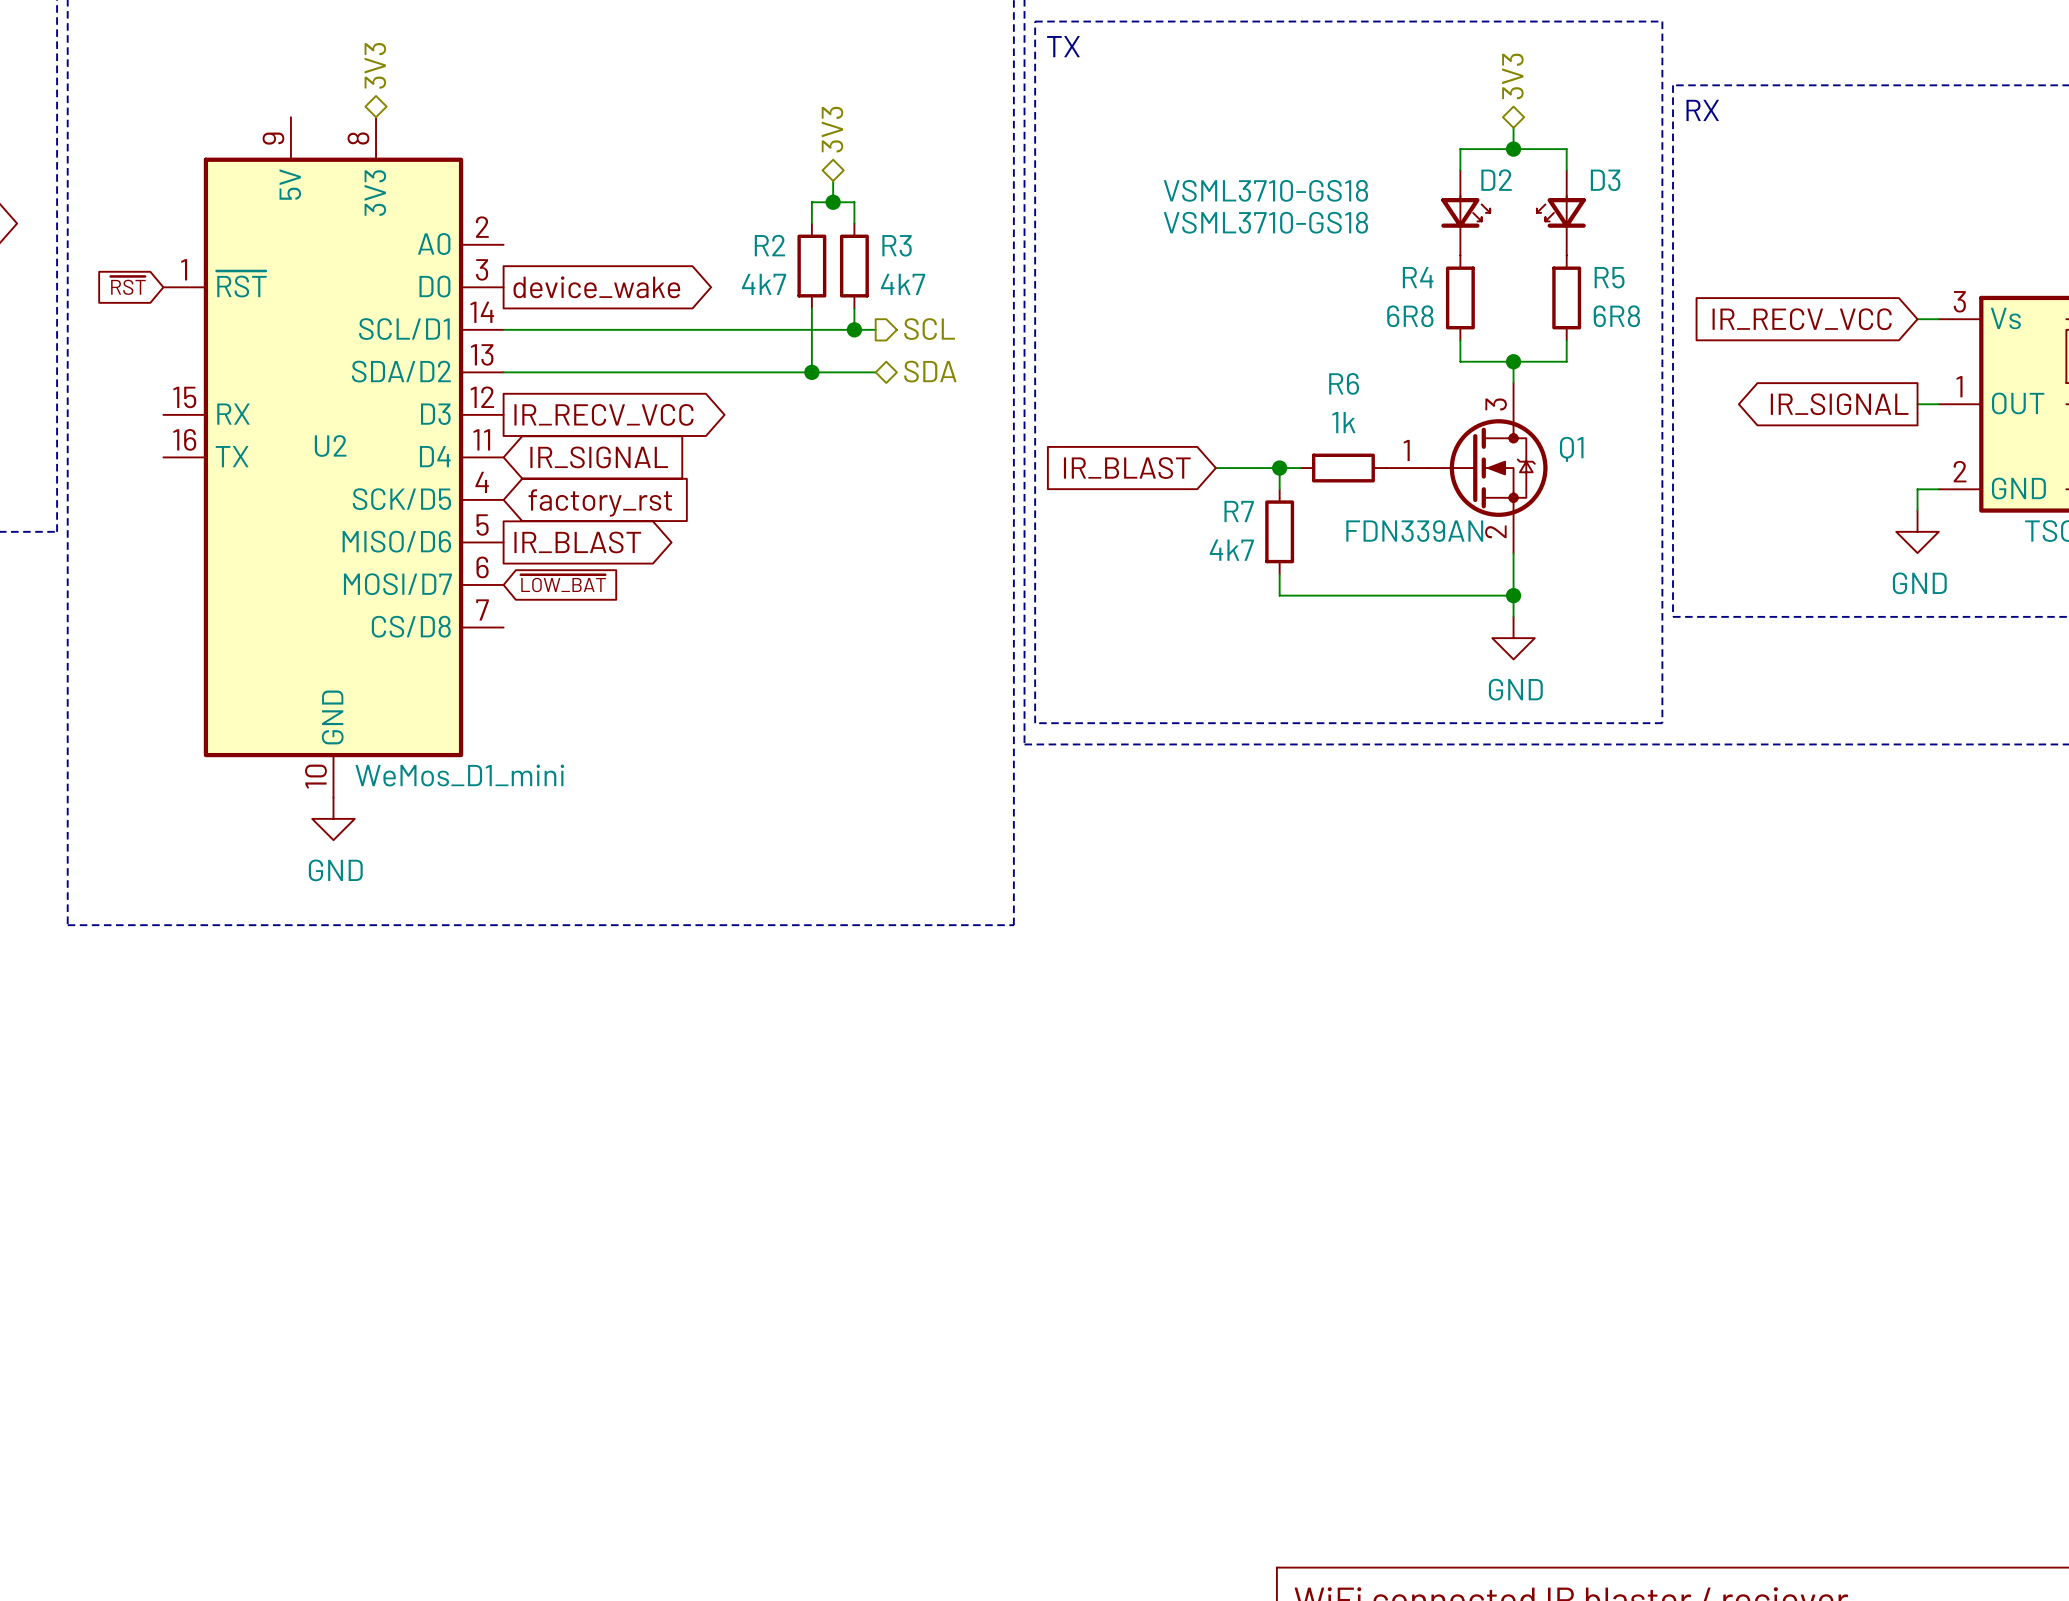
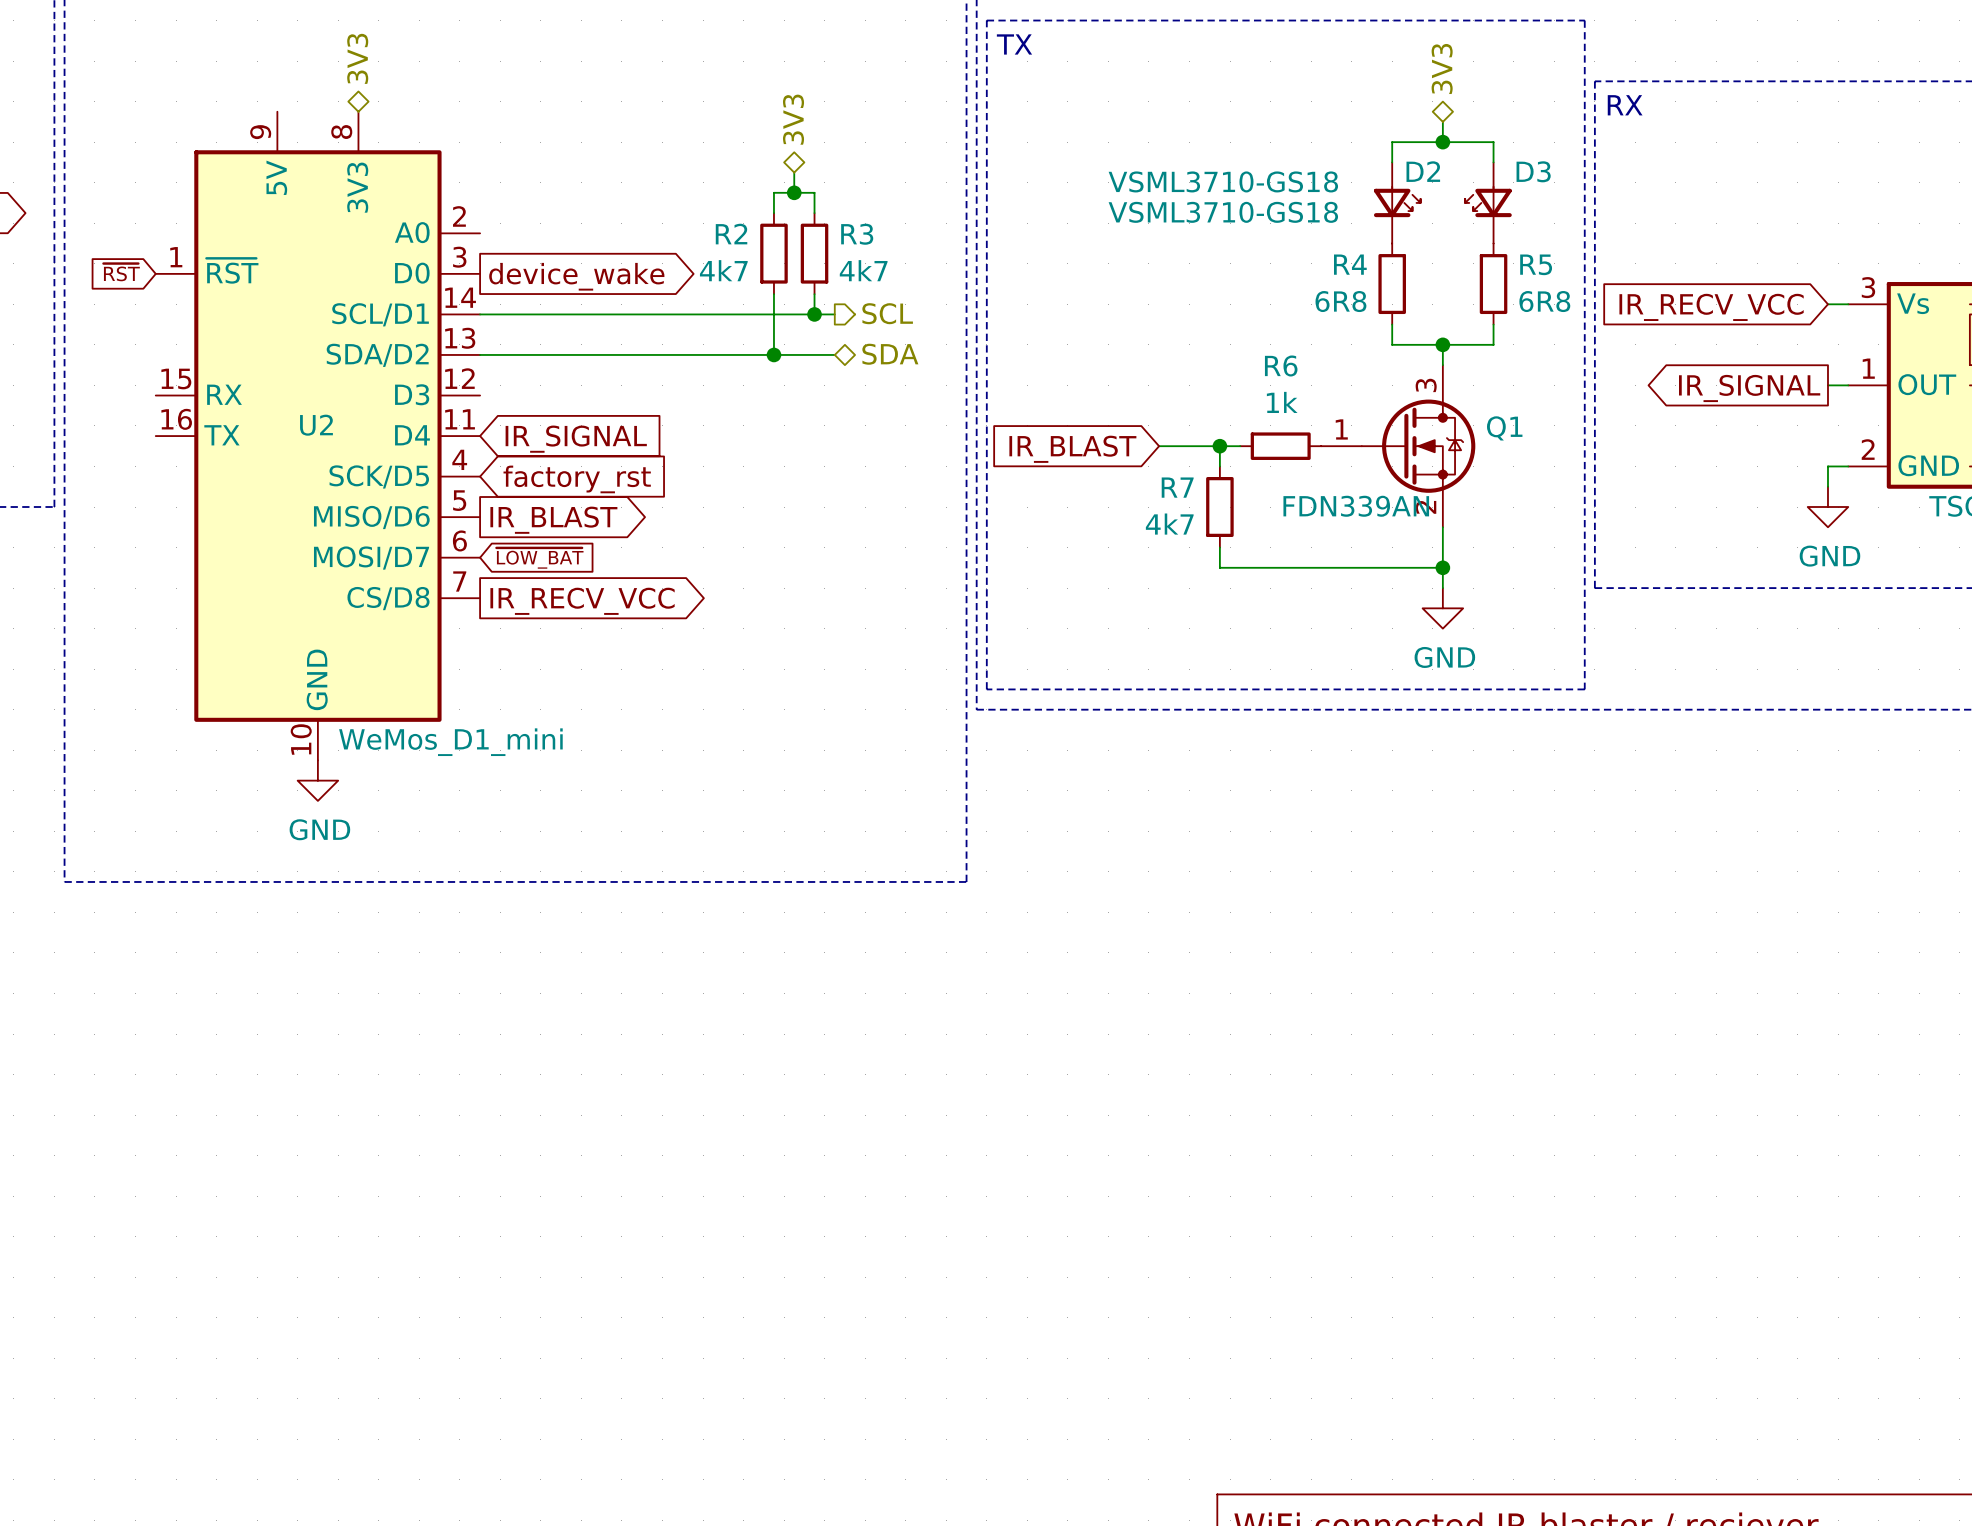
global label position: IR_RECV_VCC (603, 414) -> IR_RECV_VCC (582, 601)

